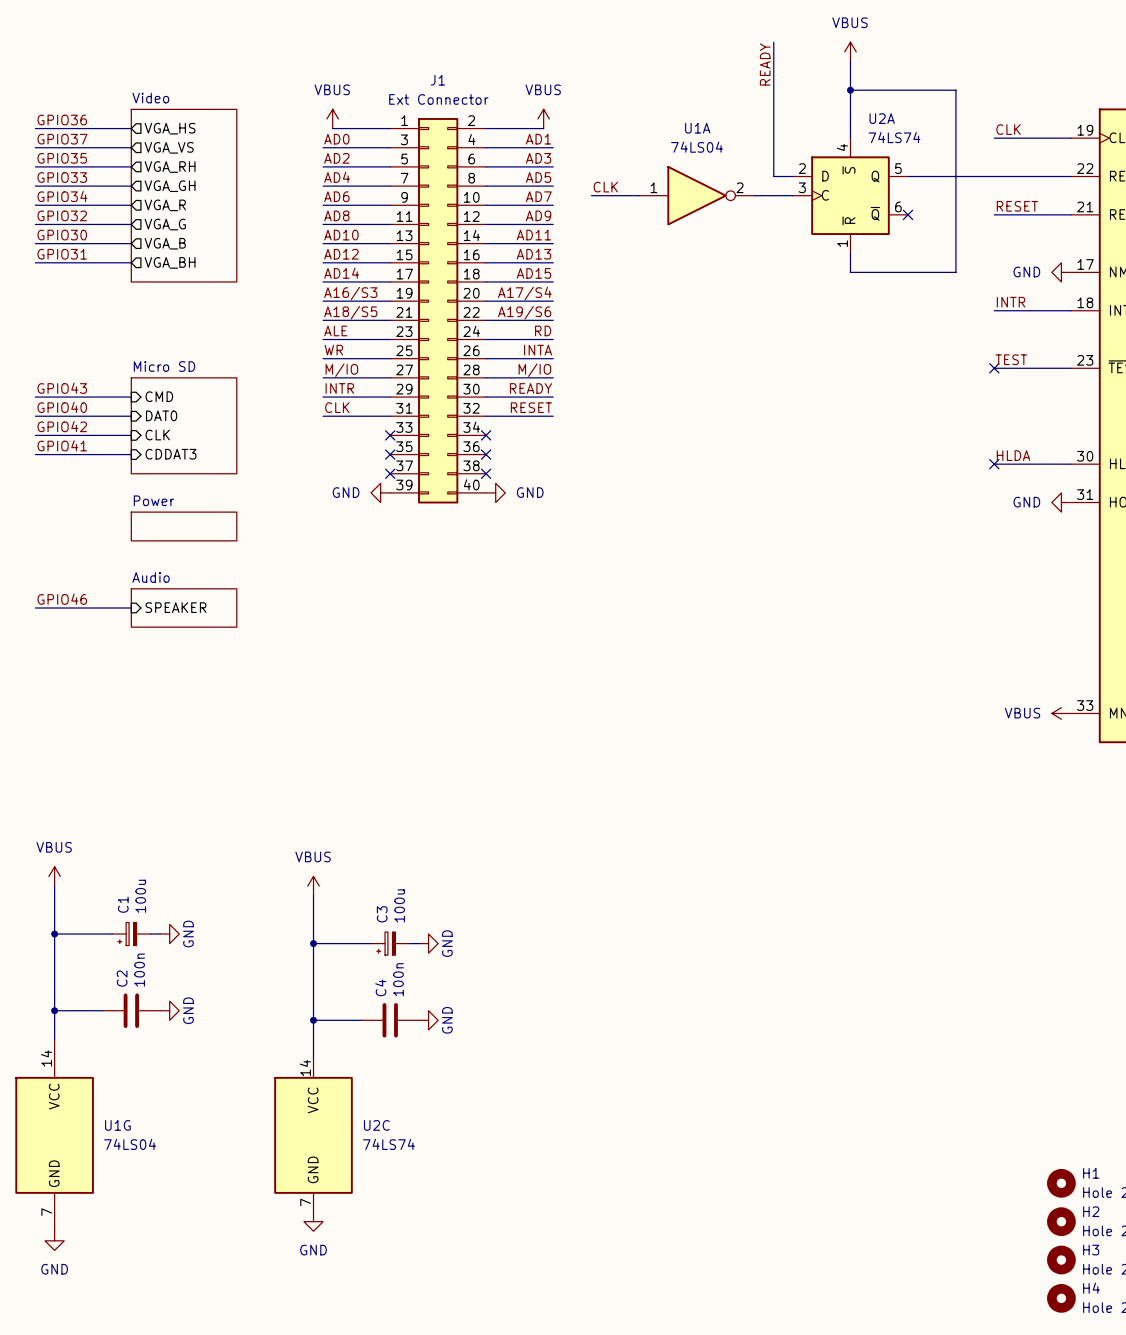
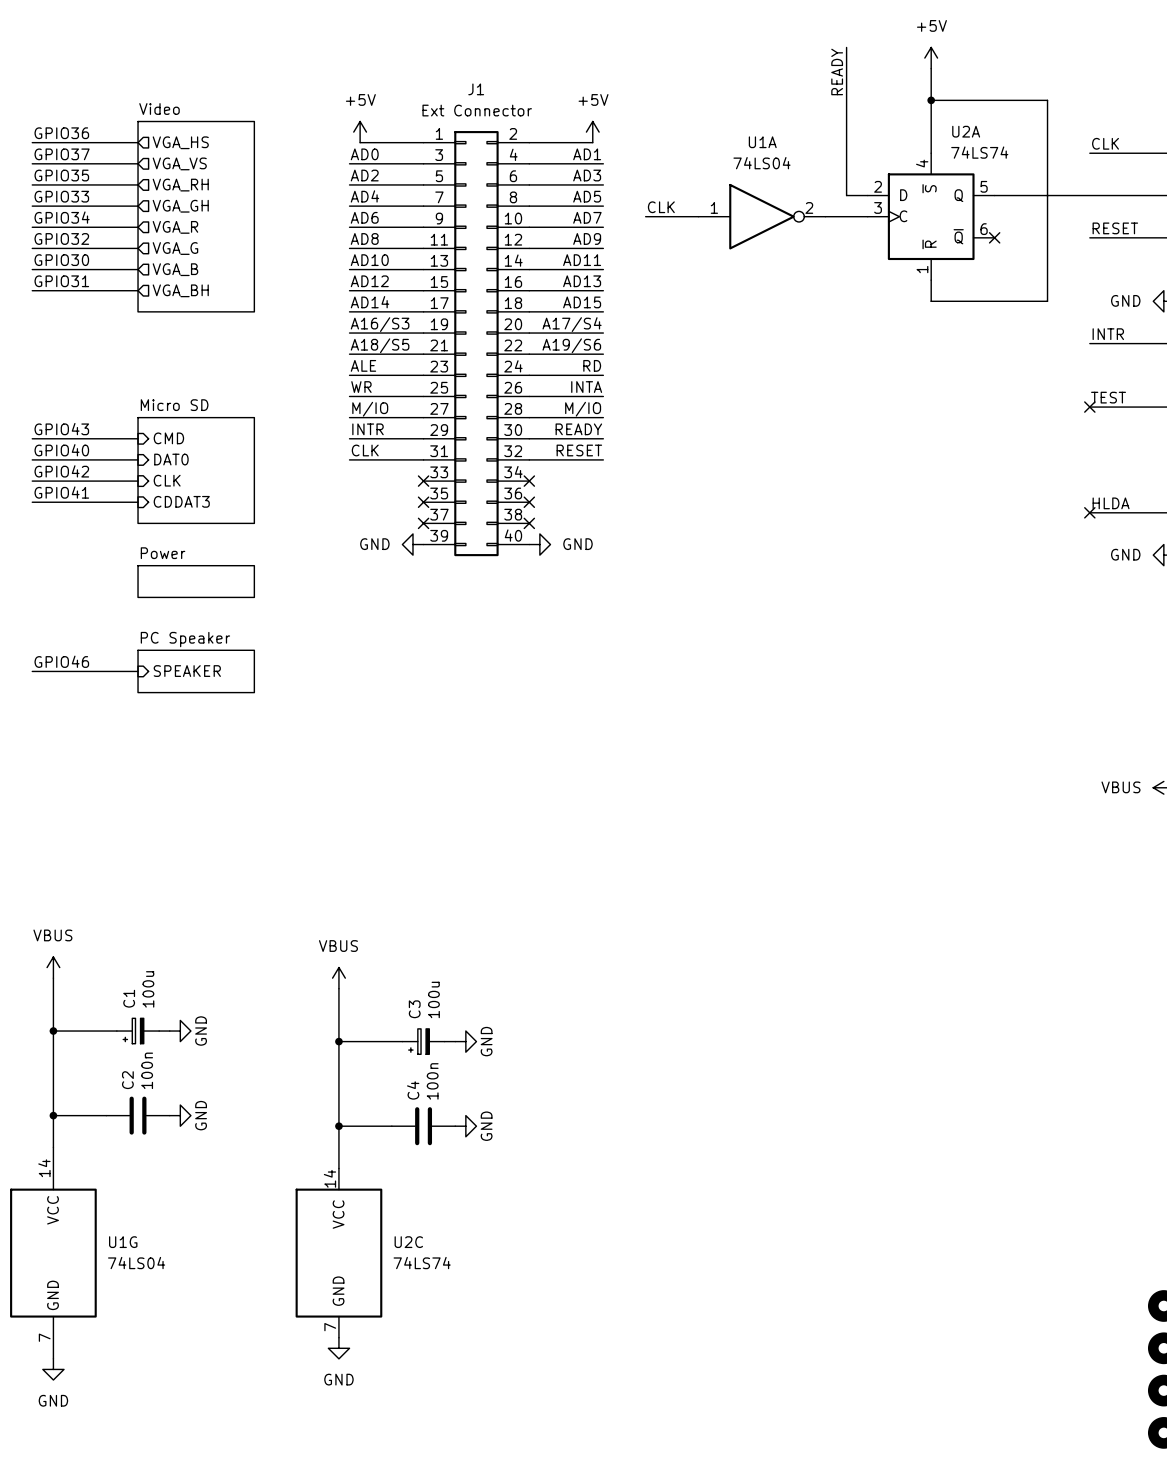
power symbol: VBUS (850, 51) -> +5V (931, 58)
power symbol: VBUS (332, 118) -> +5V (360, 132)
power symbol: VBUS (543, 118) -> +5V (592, 132)
sheet Audio name: Audio (151, 577) -> PC Speaker (185, 639)

